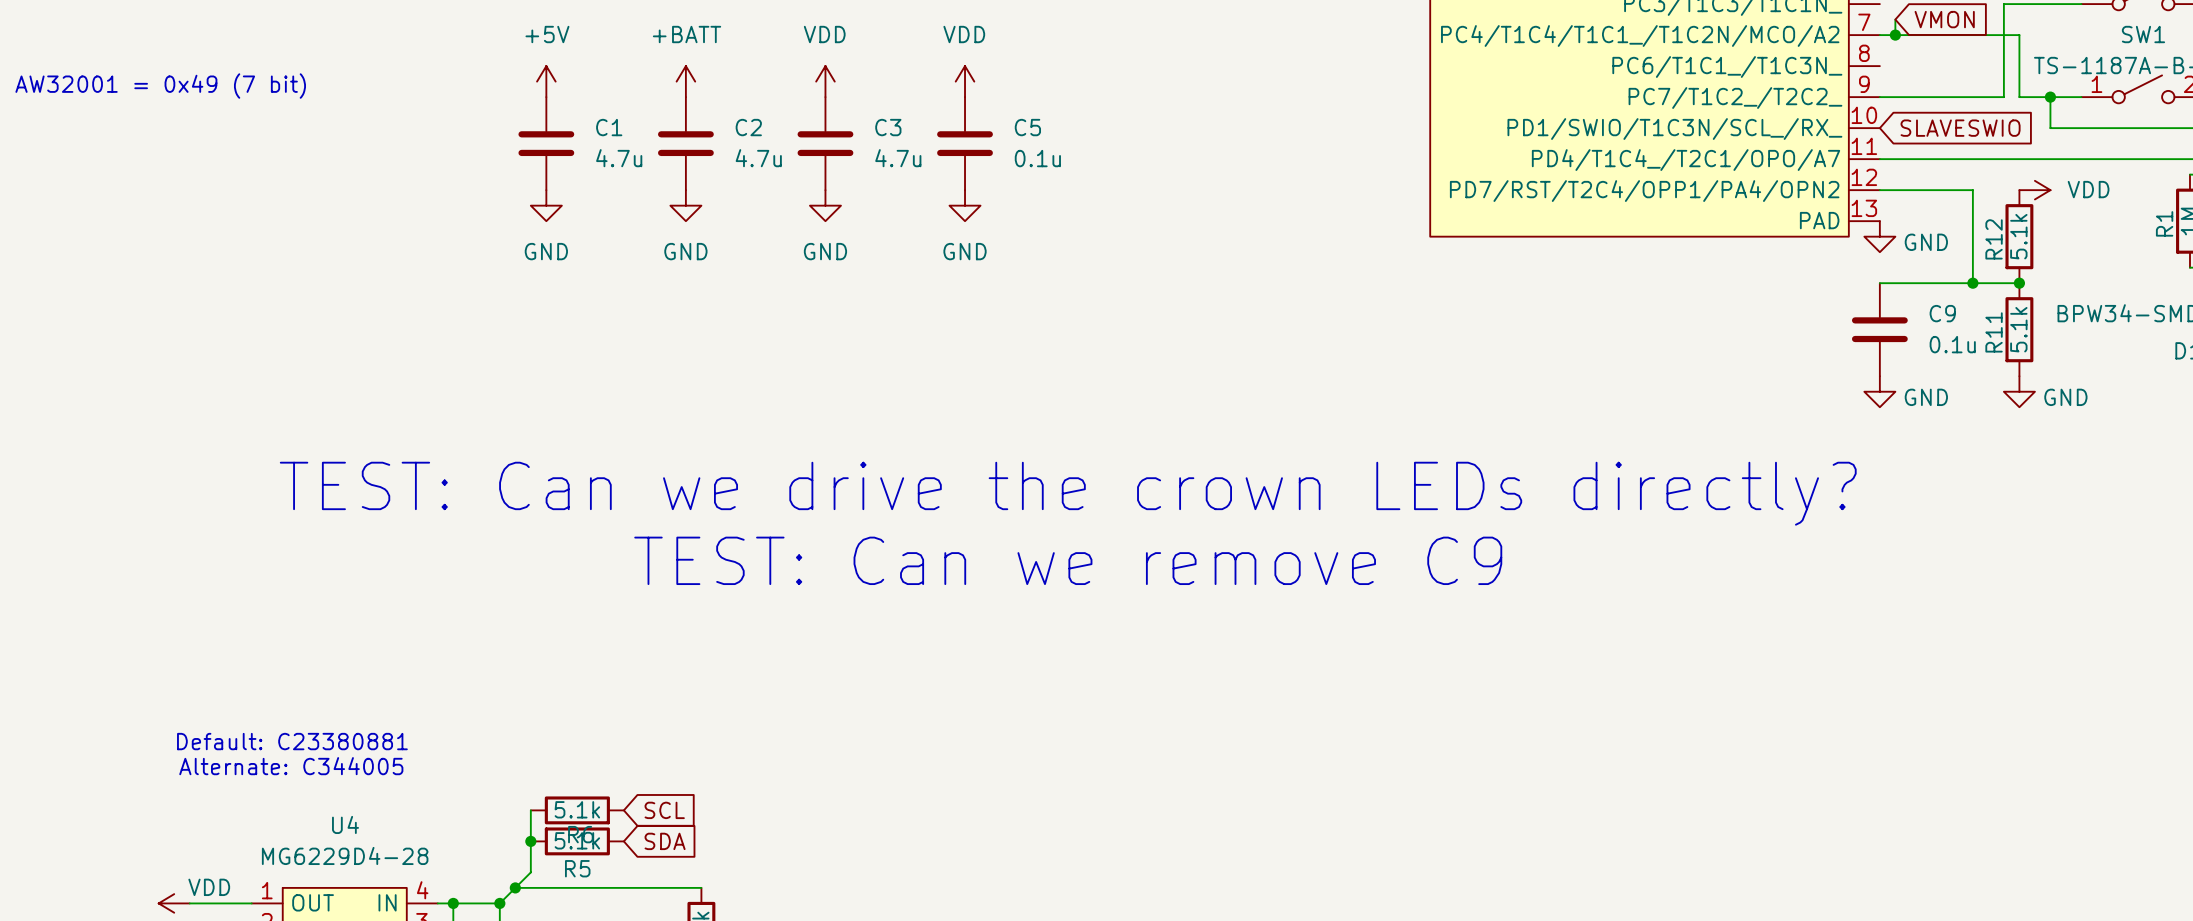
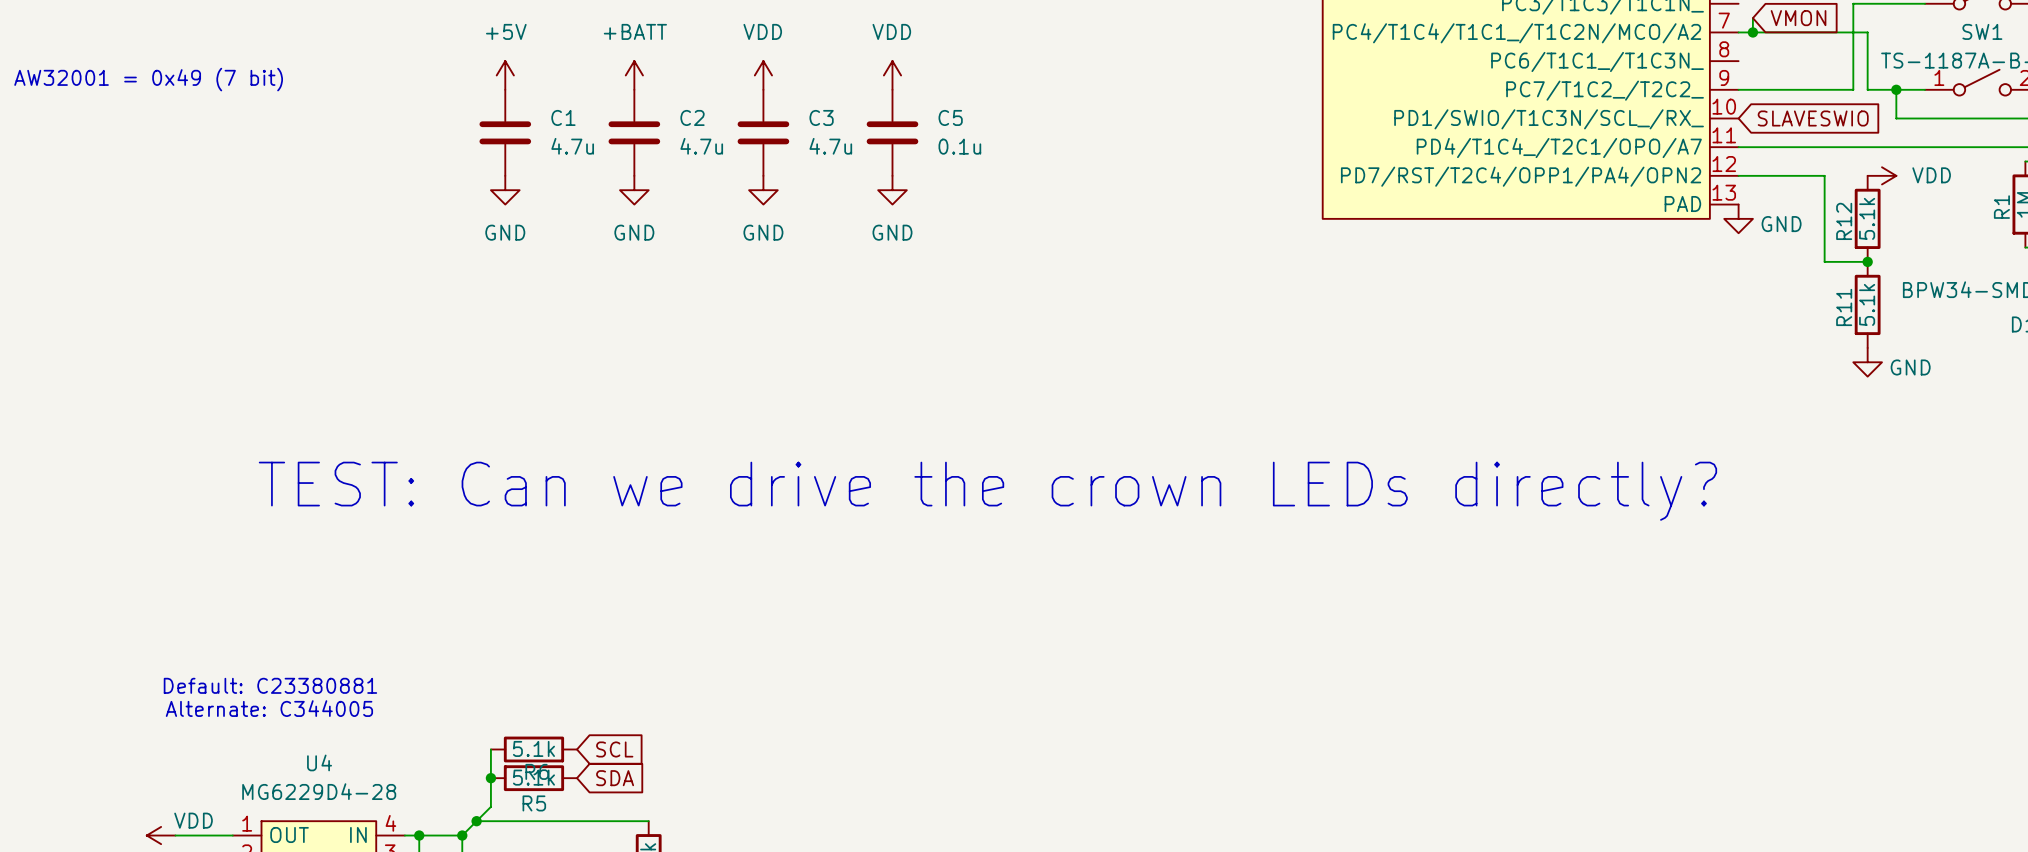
wire: (1879, 283) (1972, 283) -> none
junction: (1972, 283) -> none
C9: 0.1u (1879, 329) -> none
power symbol: GND (1879, 391) -> none
text position: TEST: Can we drive the crown LEDs directly? (1068, 493) -> TEST: Can we drive the crown LEDs directly? (987, 491)
text: TEST: Can we remove C9 (1068, 560) -> none

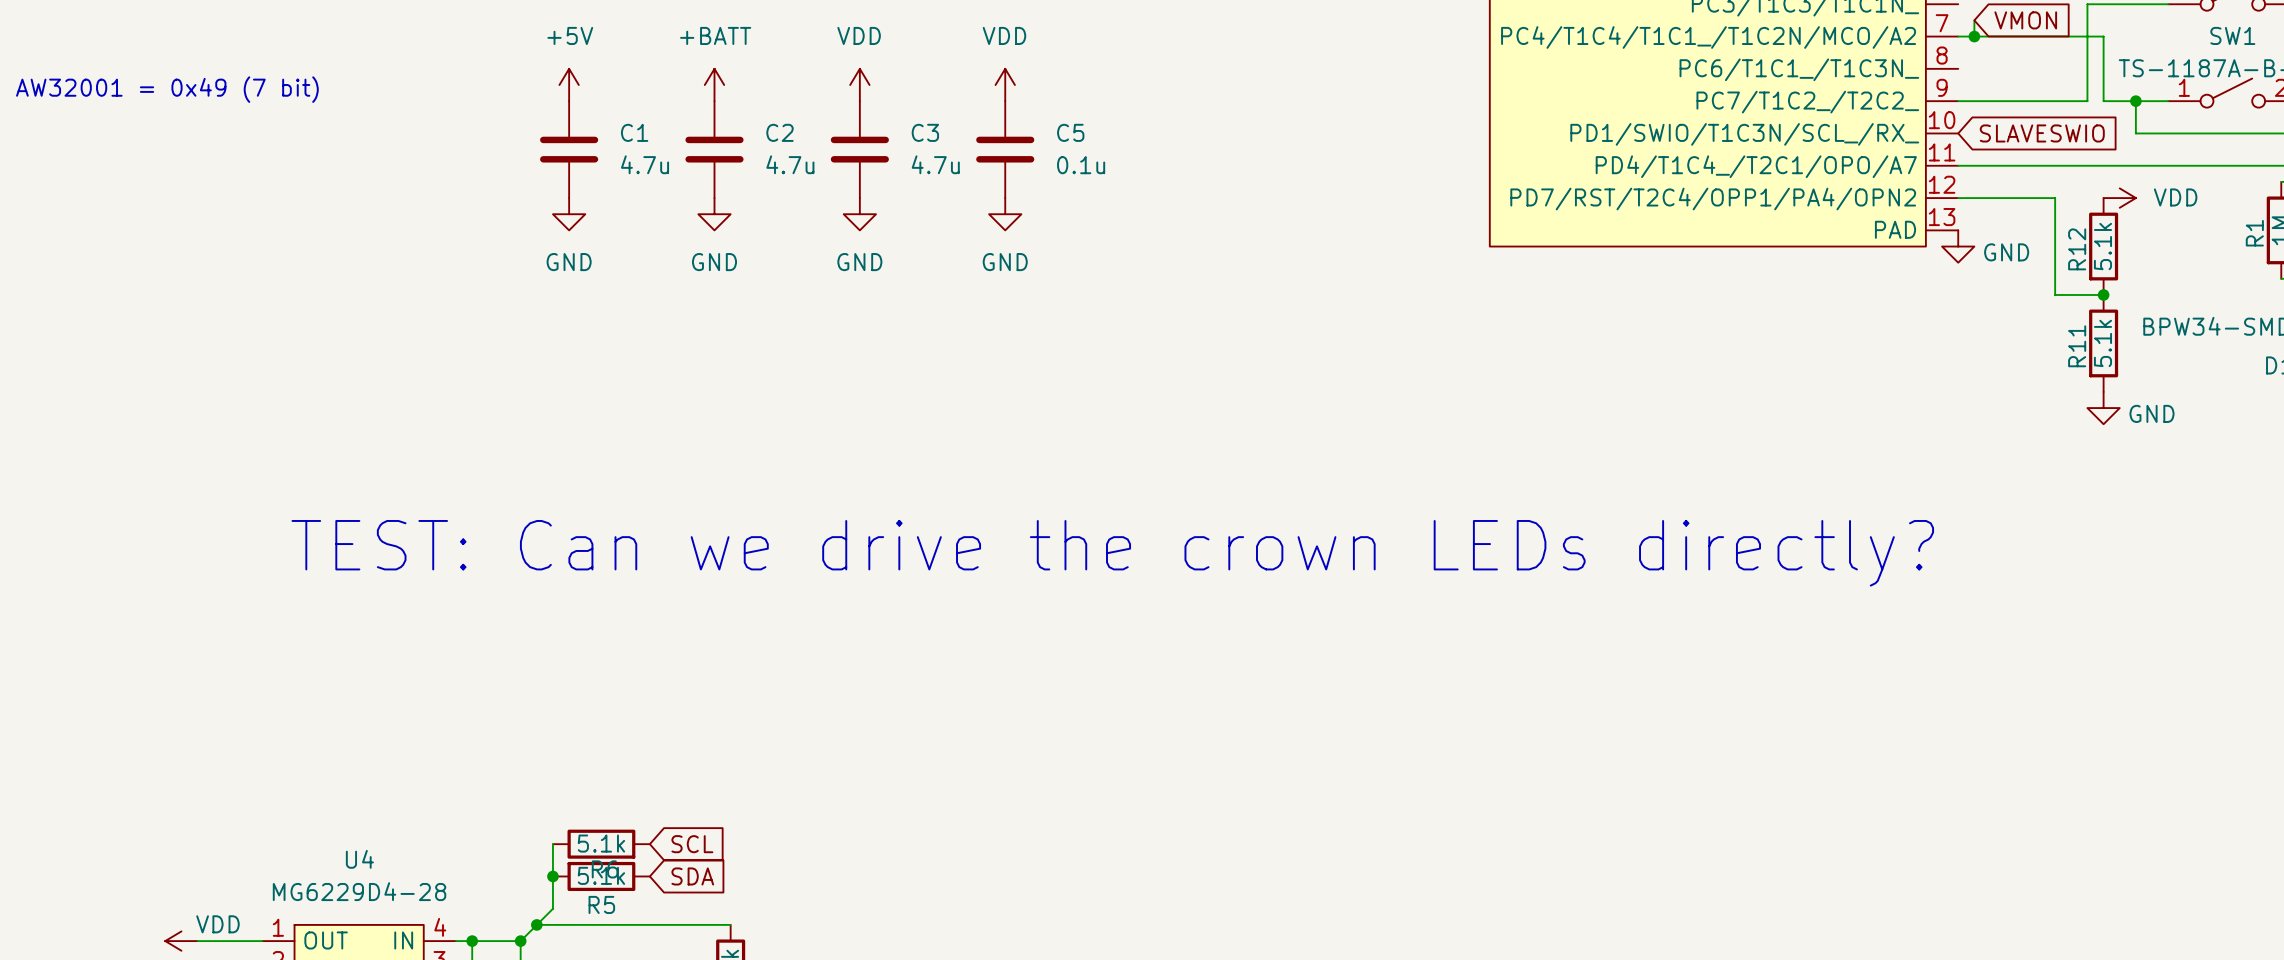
text: Default: C23380881 (270, 685) -> none
text: Alternate: C344005 (269, 708) -> none

